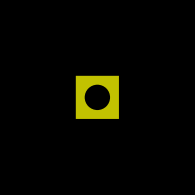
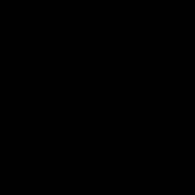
part: (97, 97) -> none

